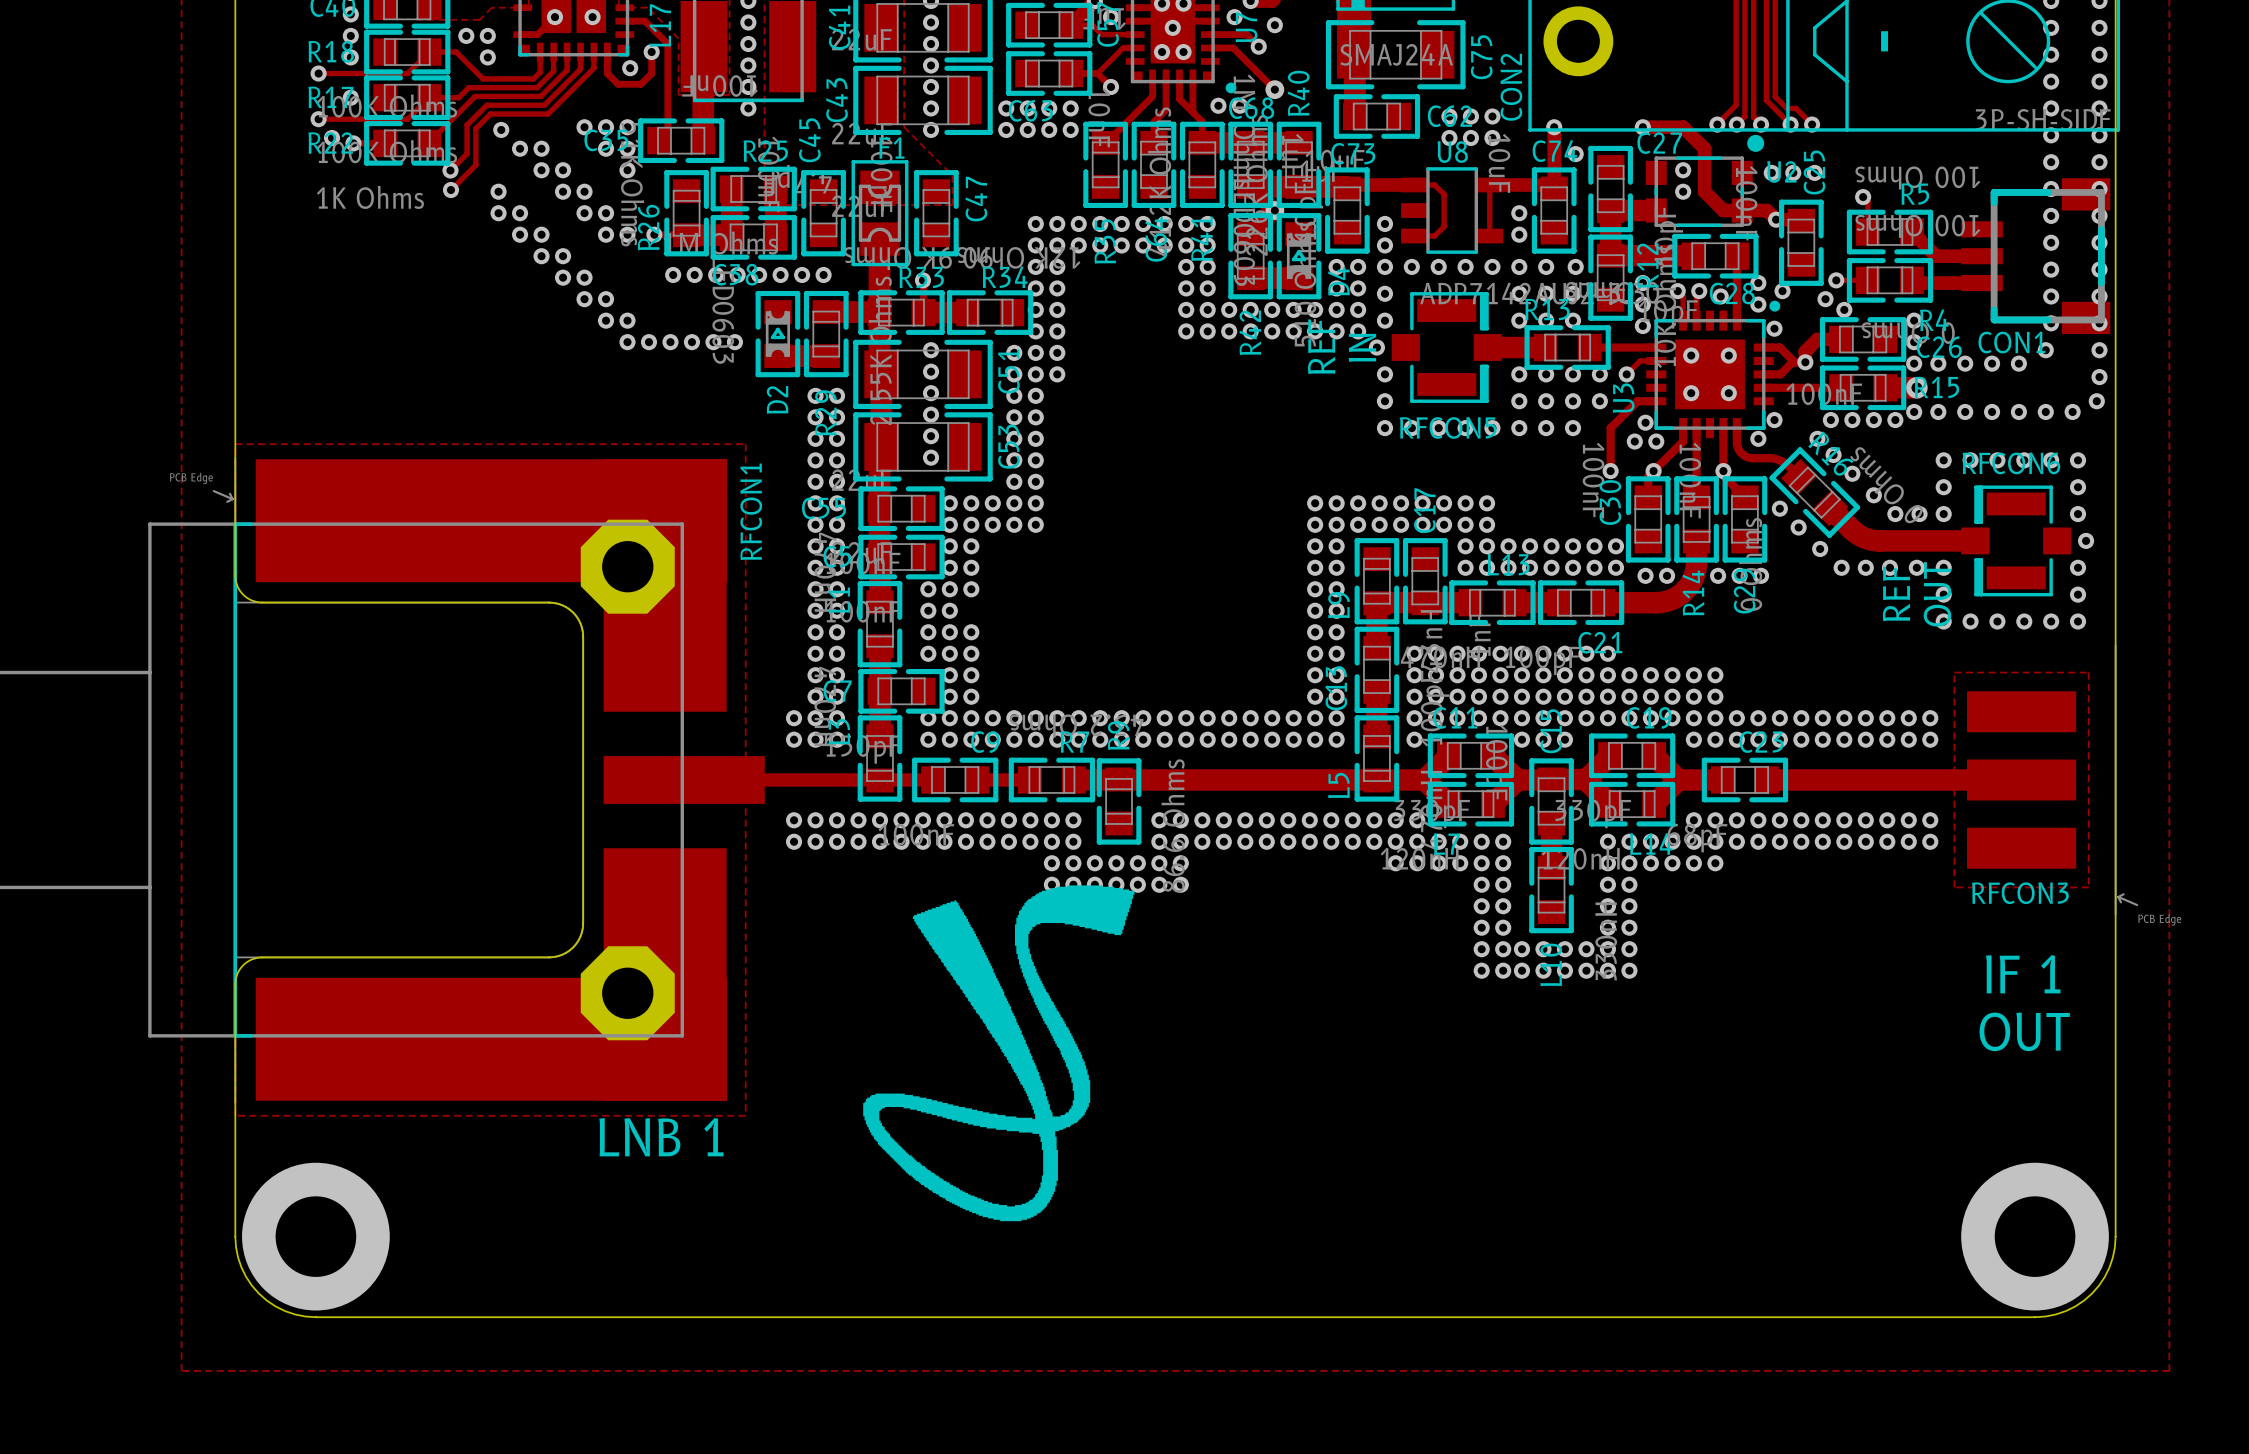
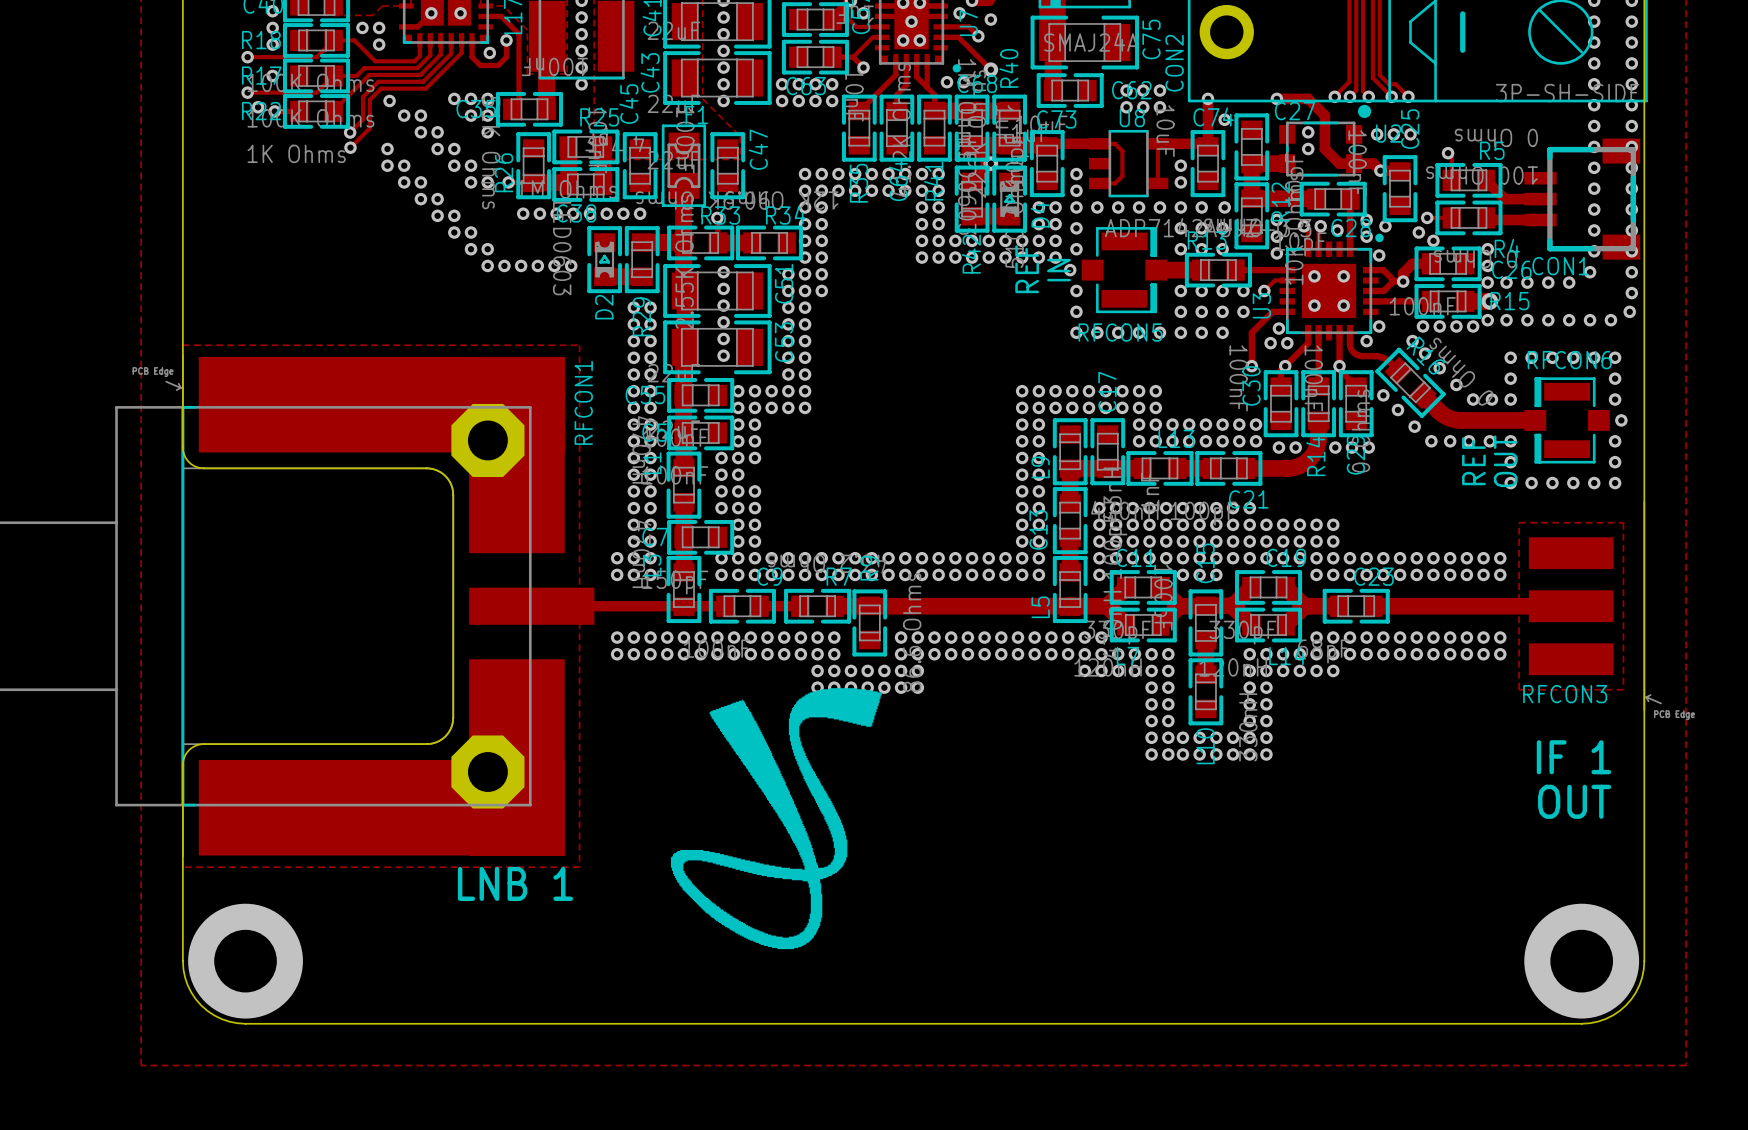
R5 value: 100 Ohms (1917, 178) -> 0 Ohms (1496, 137)

